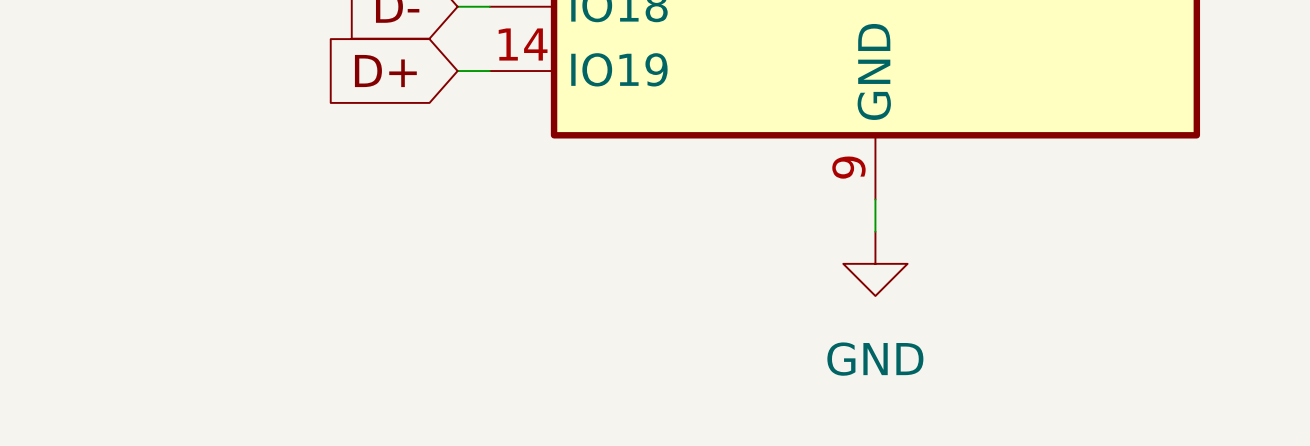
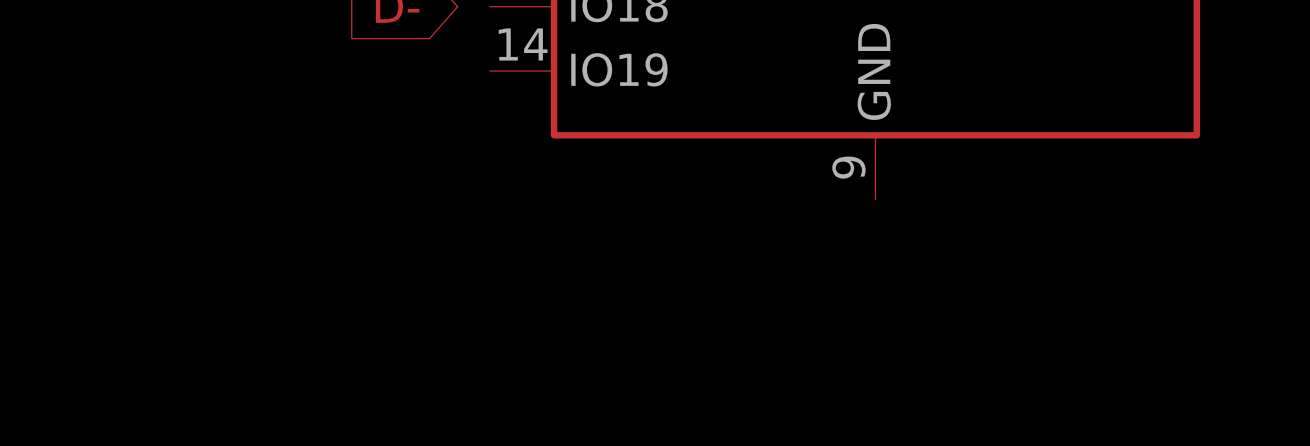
wire: (457, 6) (489, 6) -> none
global label: D+ (385, 71) -> none
wire: (457, 71) (489, 71) -> none
wire: (875, 199) (875, 231) -> none
power symbol: GND (875, 263) -> none

